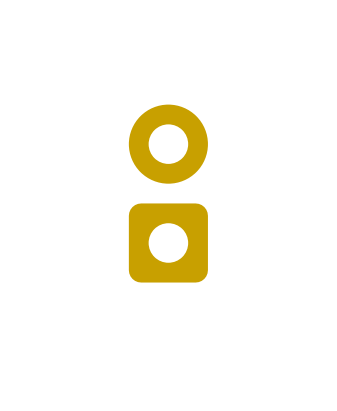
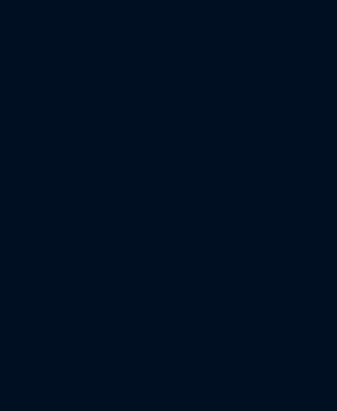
part: (168, 193) -> none

